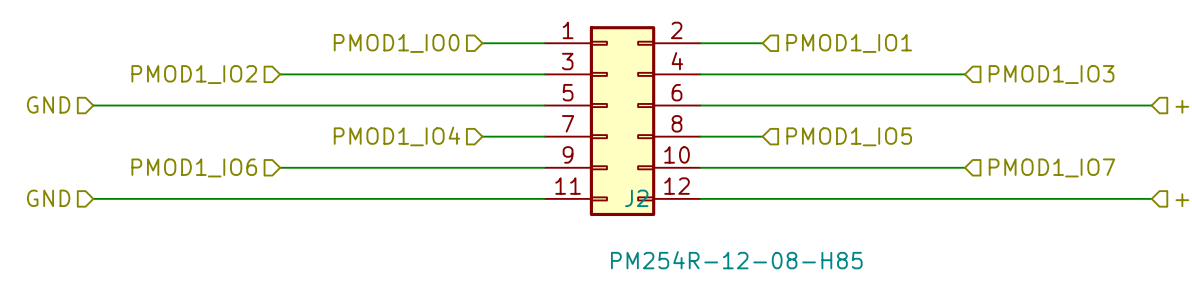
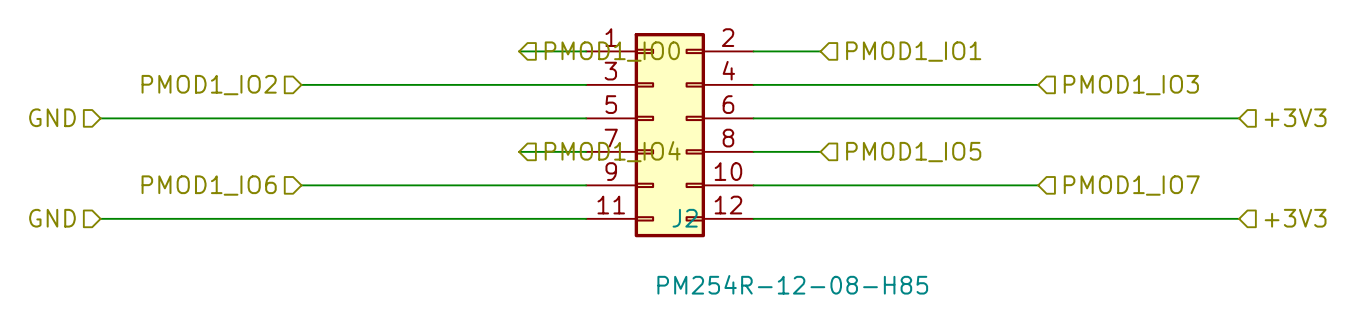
hierarchical label rotation: 0° (396, 43) -> 180° (612, 51)
hierarchical label position: PMOD1_IO0 (396, 43) -> PMOD1_IO0 (612, 51)
hierarchical label rotation: 0° (396, 136) -> 180° (612, 151)
hierarchical label position: PMOD1_IO4 (396, 136) -> PMOD1_IO4 (612, 151)

